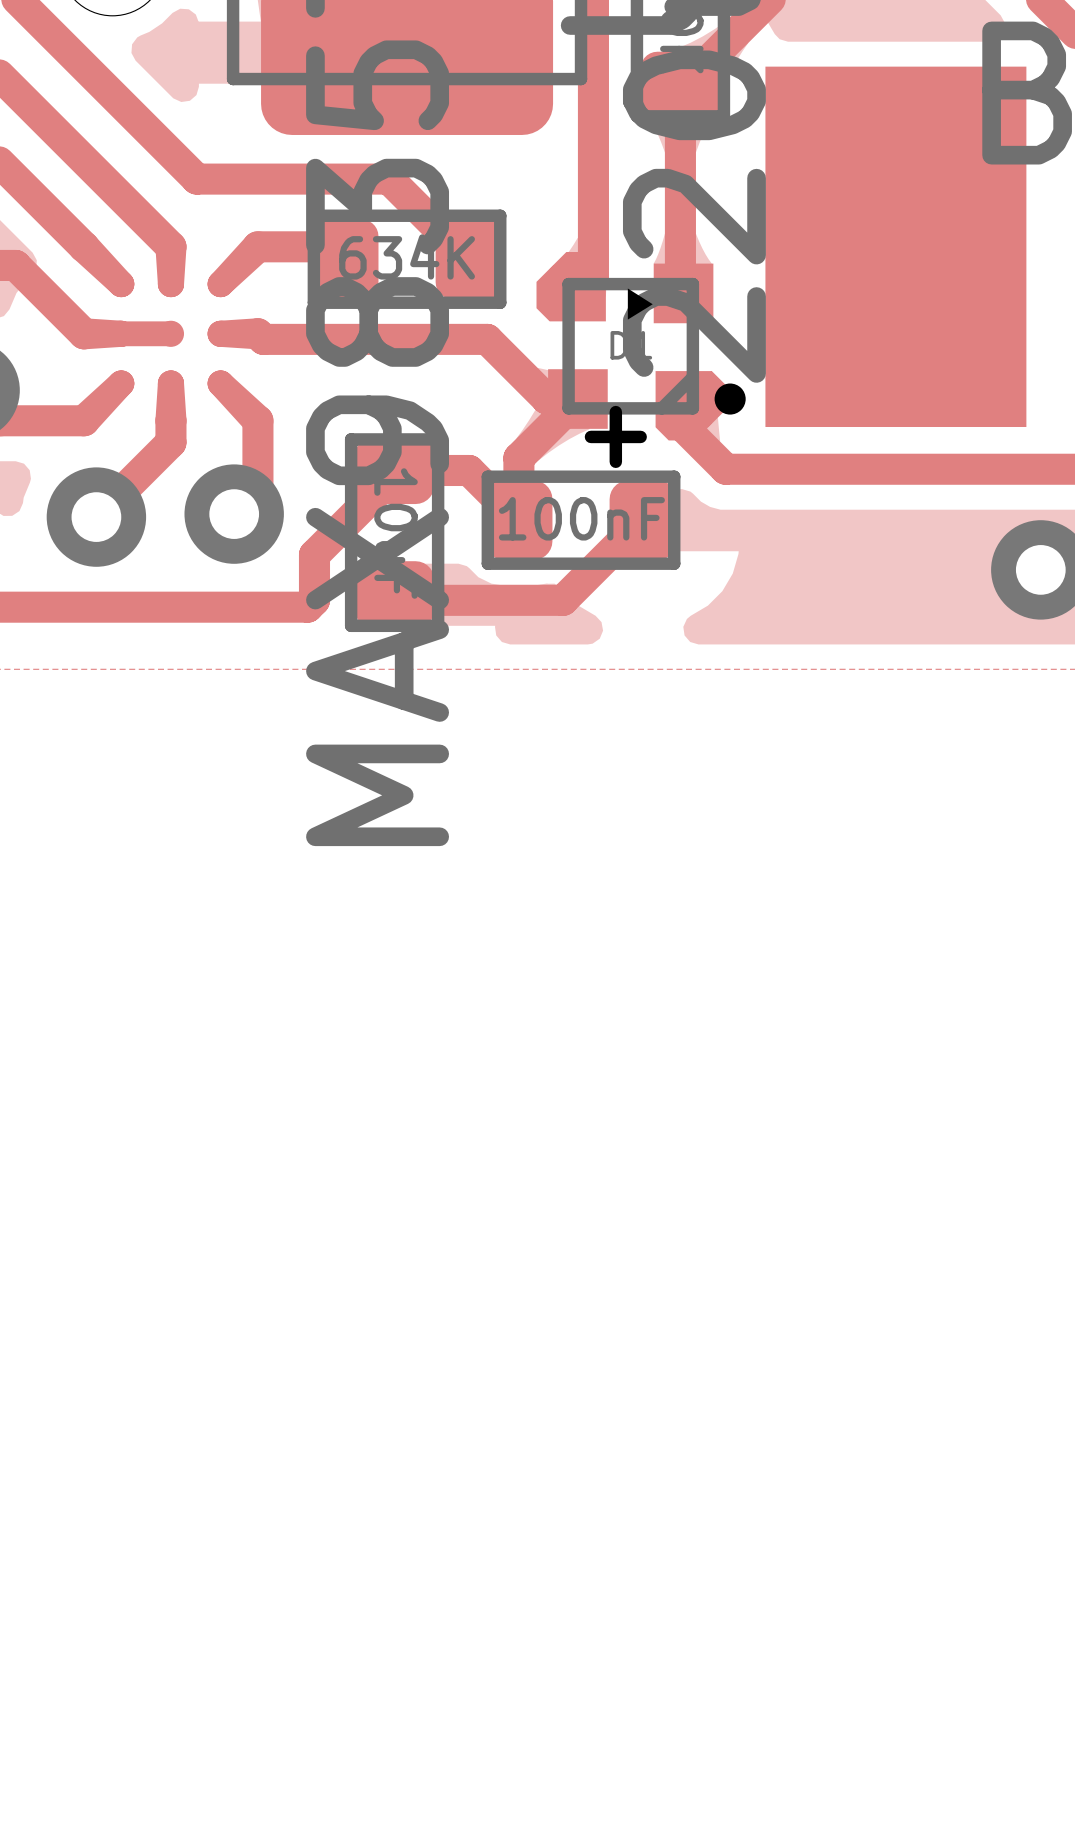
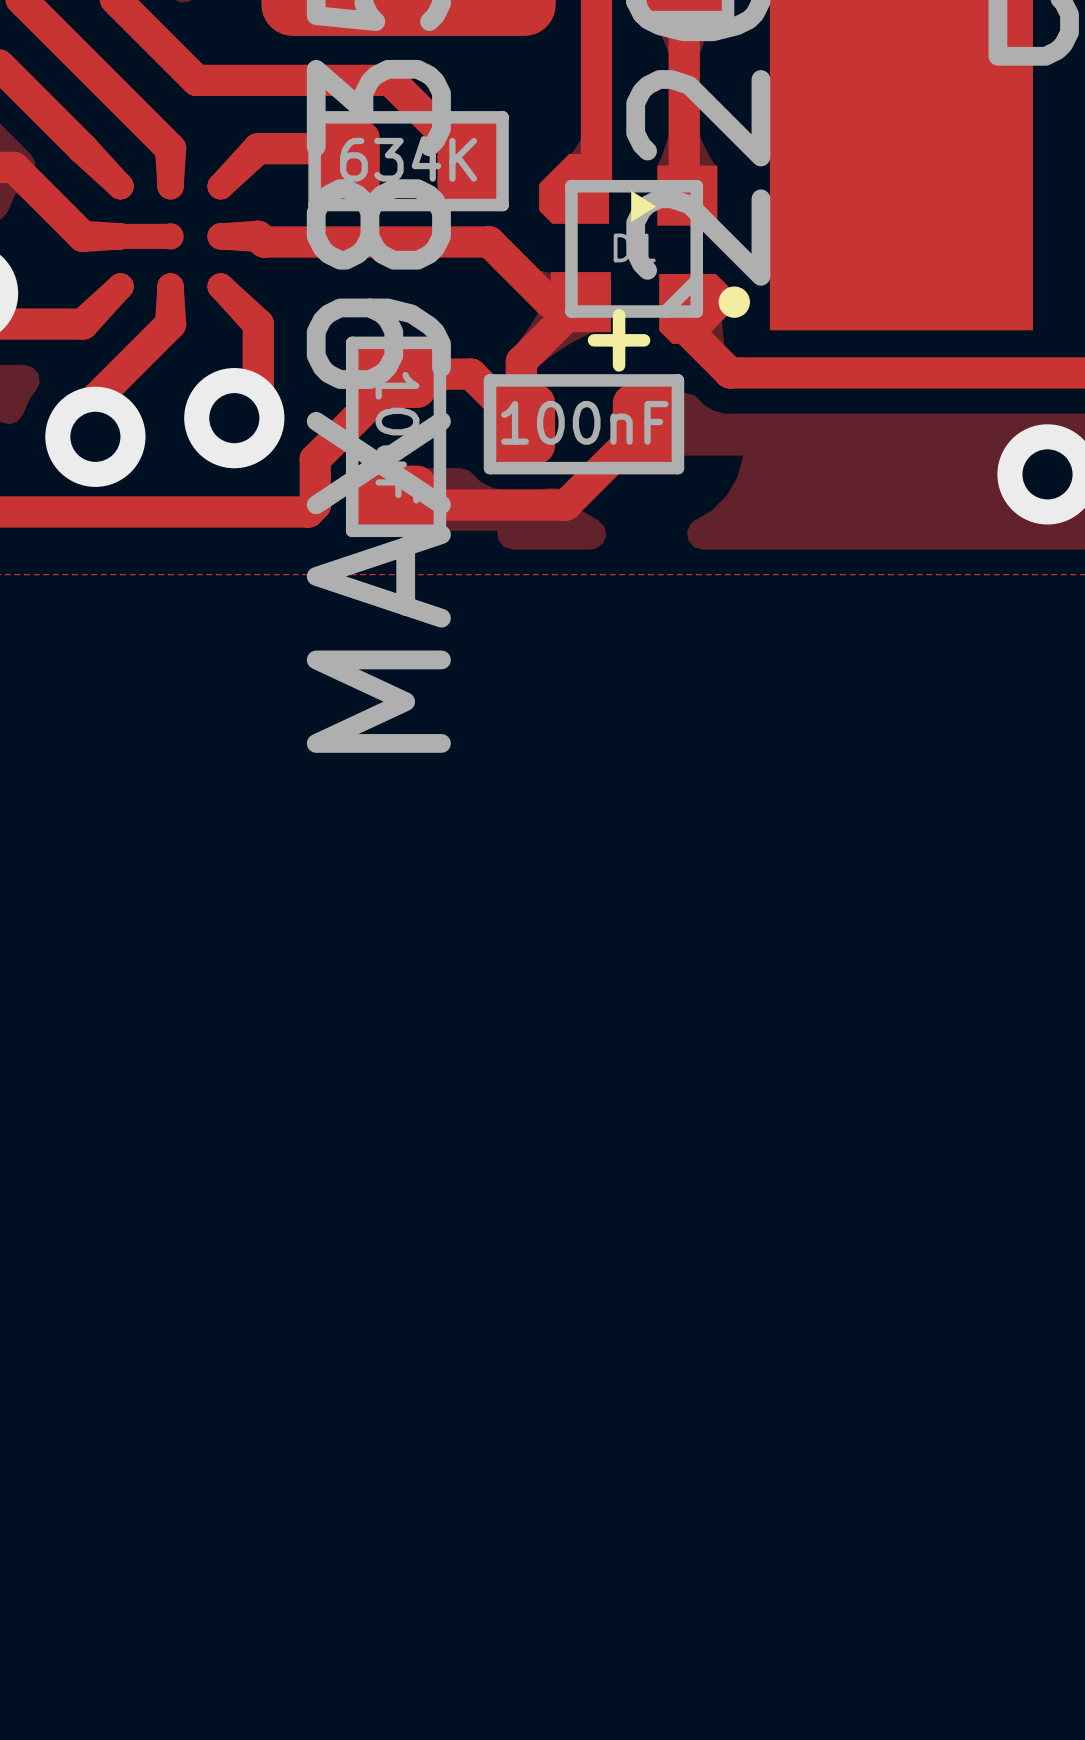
track: (170, 420) (170, 442) (96, 517) -> (170, 324) (95, 399) (95, 436)
via position: (96, 517) -> (95, 436)

